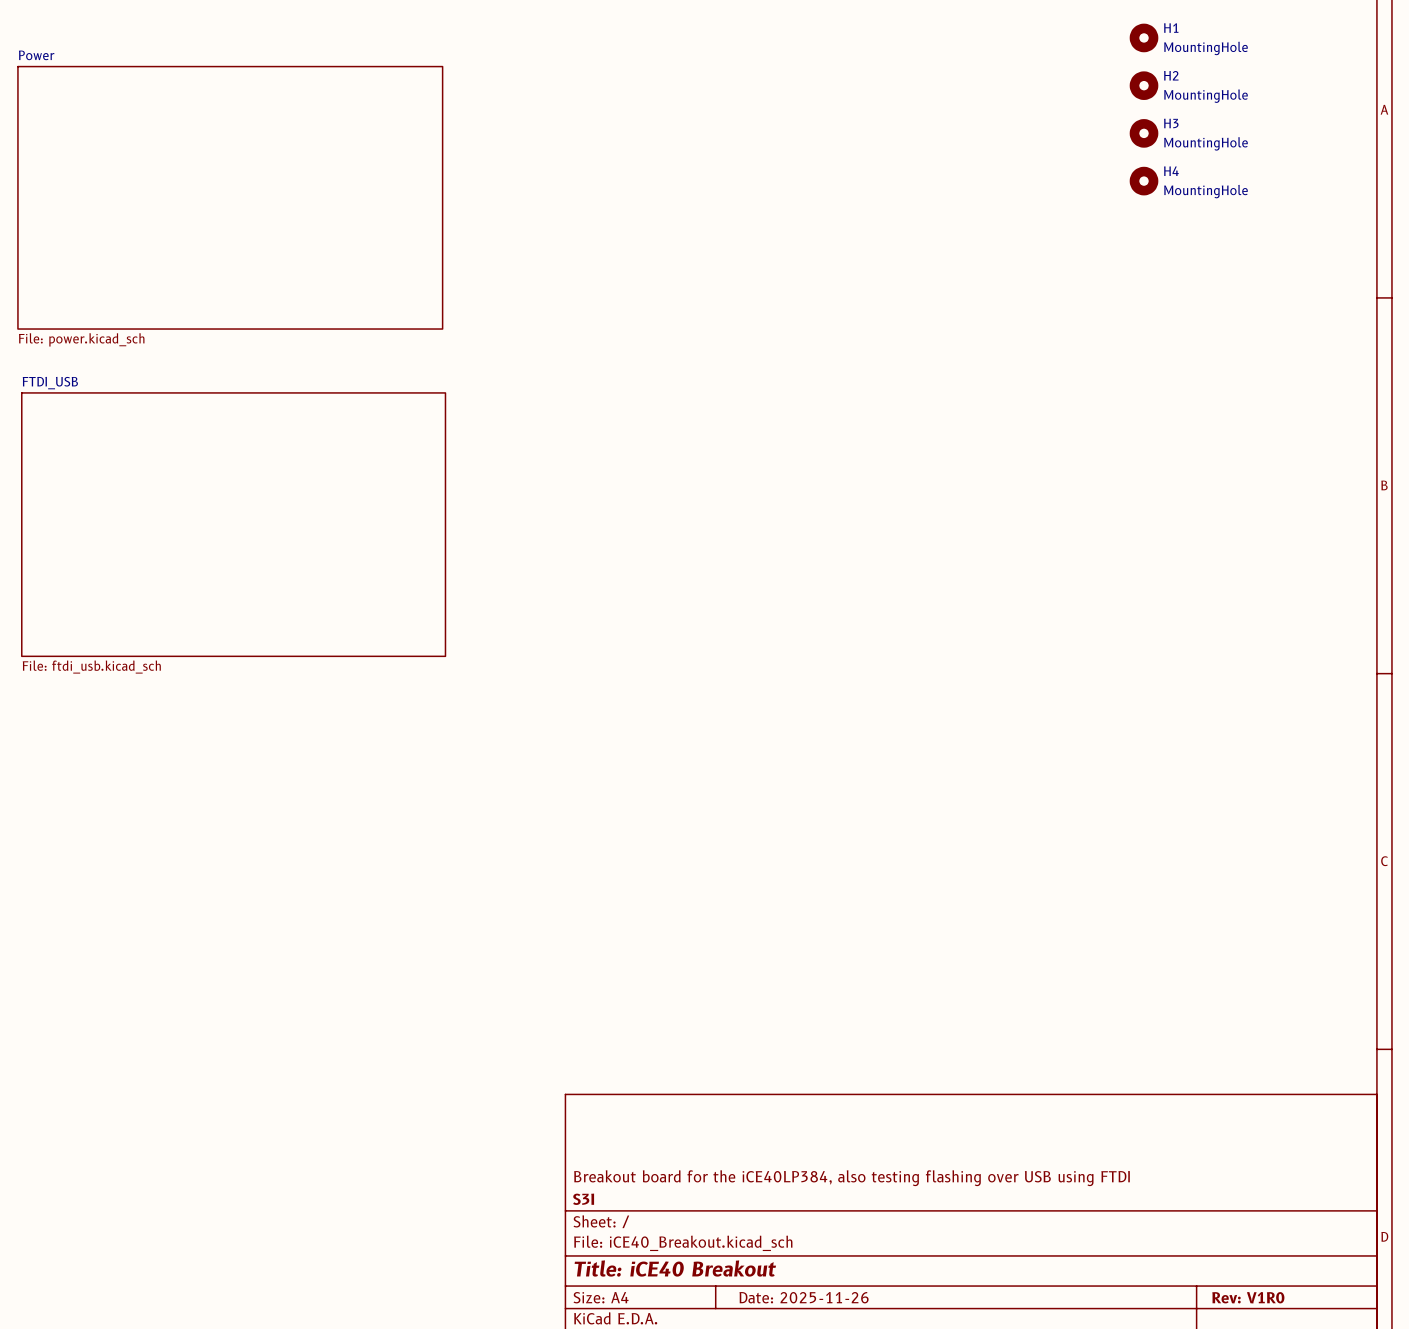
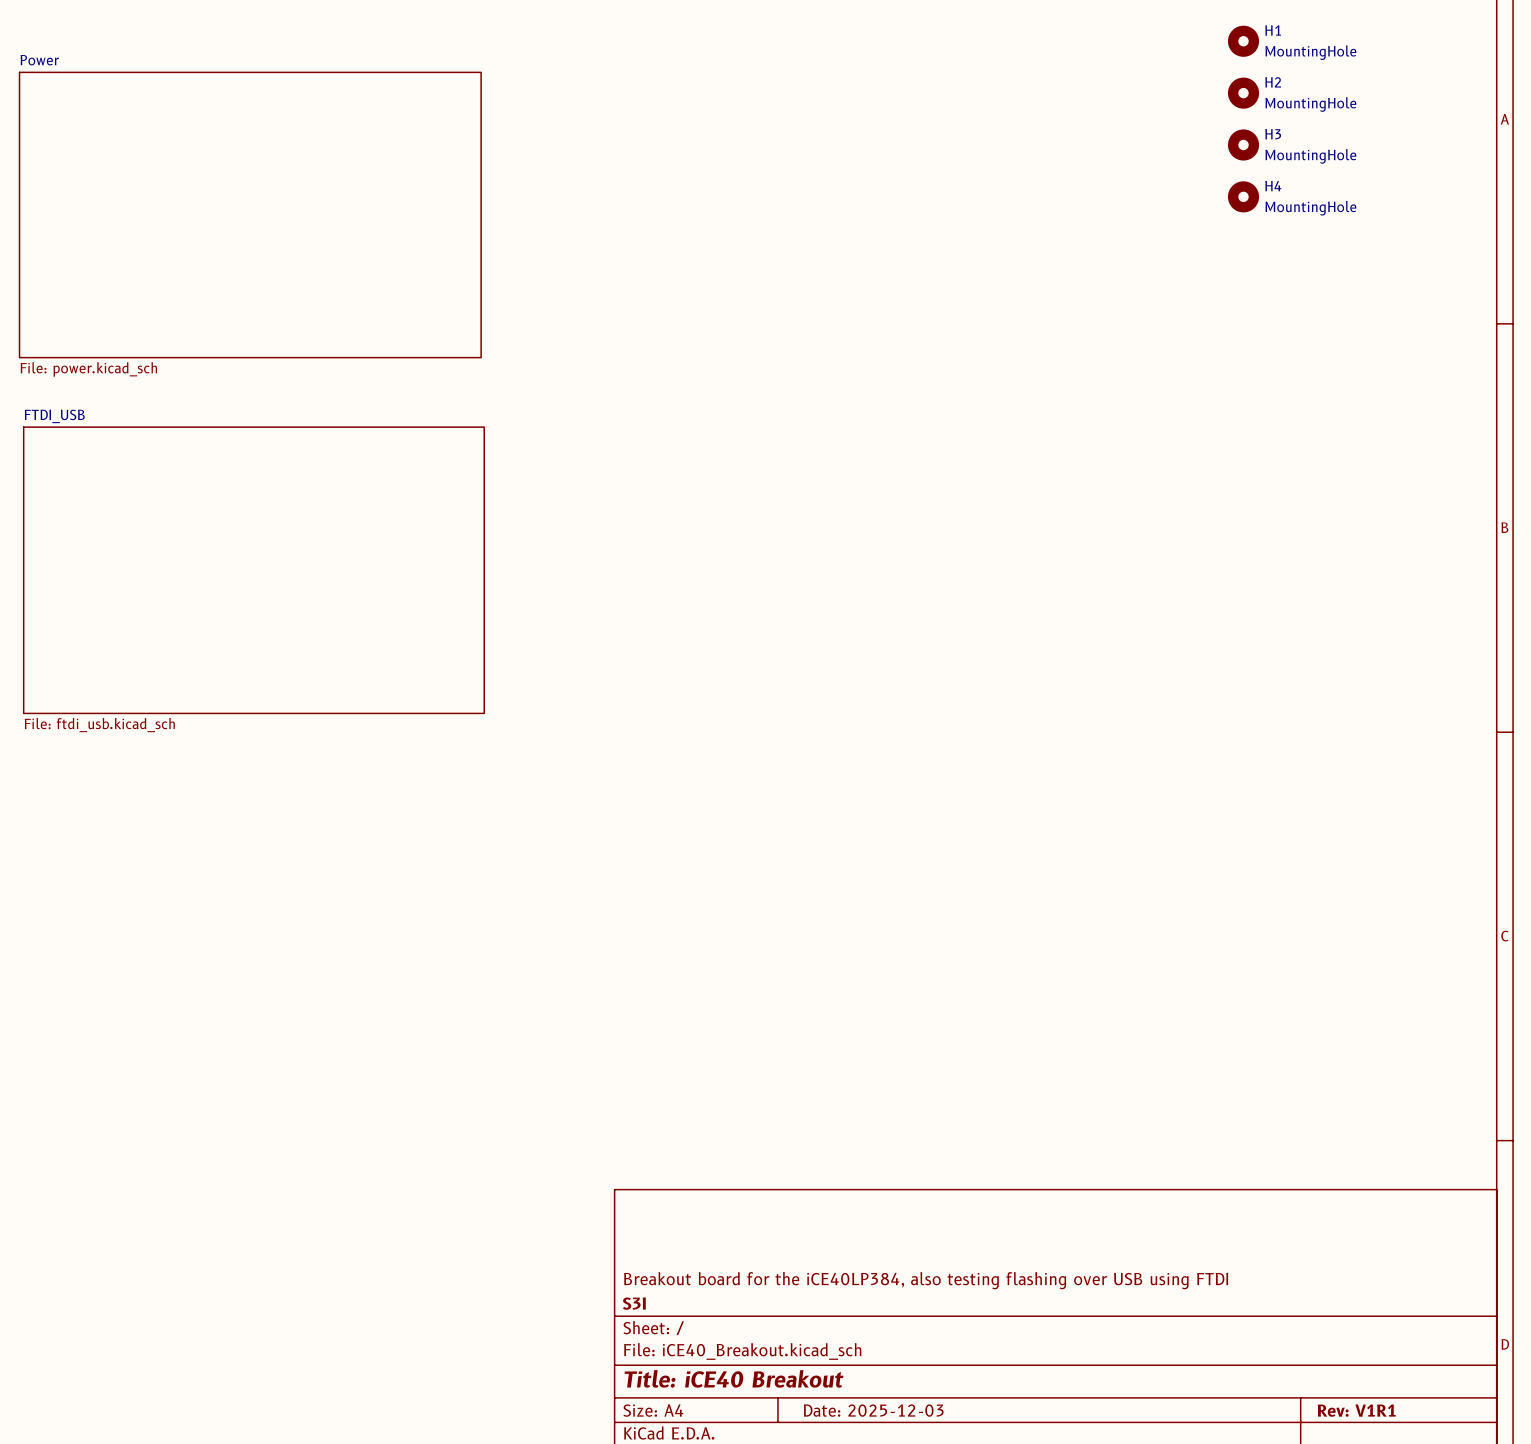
title block: Date: 2025-11-26 (804, 1297) -> Date: 2025-12-03 (873, 1410)
title block: Rev: V1R0 (1248, 1297) -> Rev: V1R1 (1356, 1410)

